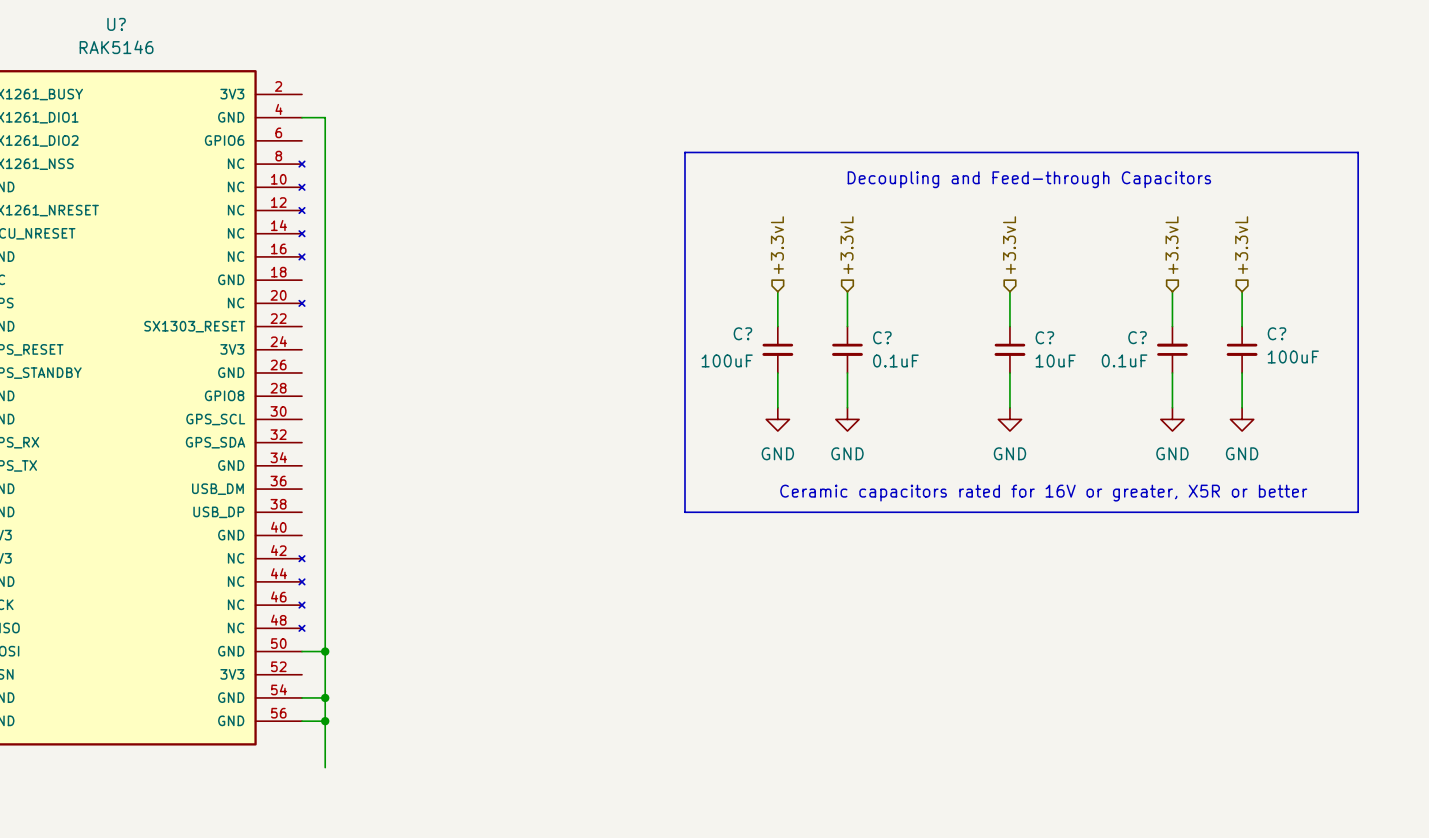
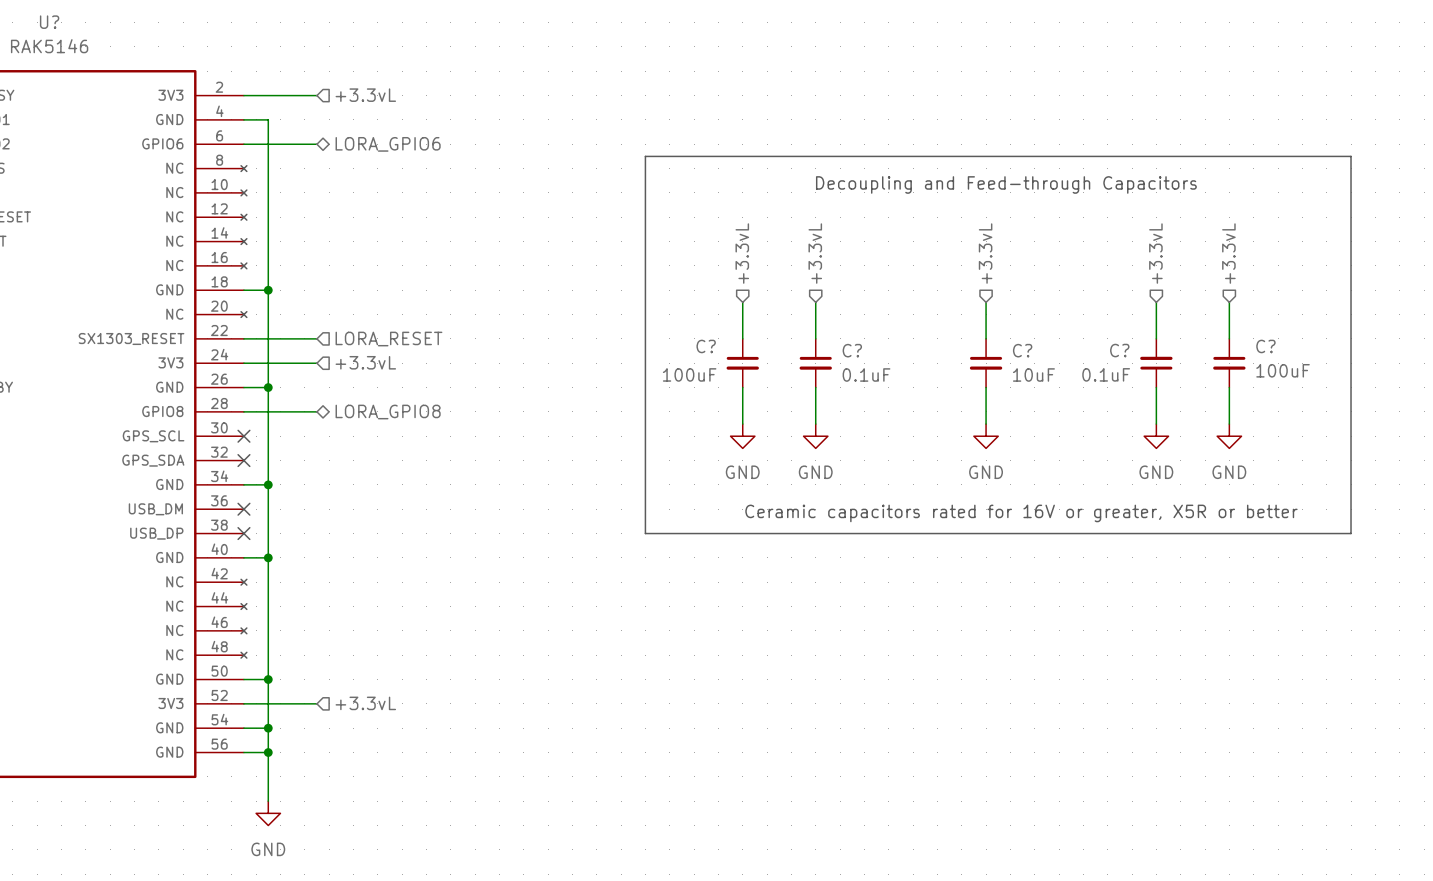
wire: none -> (243, 95) (316, 95)
hierarchical label: none -> +3.3vL (365, 95)
wire: none -> (243, 144) (316, 144)
hierarchical label: none -> LORA_GPIO6 (388, 144)
wire: none -> (243, 290) (268, 290)
junction: none -> (268, 290)
wire: none -> (243, 338) (316, 338)
hierarchical label: none -> LORA_RESET (388, 339)
wire: none -> (243, 363) (316, 363)
hierarchical label: none -> +3.3vL (365, 362)
wire: none -> (243, 387) (268, 387)
junction: none -> (268, 387)
wire: none -> (243, 411) (316, 411)
hierarchical label: none -> LORA_GPIO8 (388, 412)
no-connect mark: none -> (243, 436)
no-connect mark: none -> (243, 460)
wire: none -> (243, 484) (268, 484)
junction: none -> (268, 484)
no-connect mark: none -> (243, 509)
no-connect mark: none -> (243, 533)
wire: none -> (243, 557) (268, 557)
junction: none -> (268, 557)
wire: none -> (243, 703) (316, 703)
hierarchical label: none -> +3.3vL (365, 703)
power symbol: none -> GND (268, 813)

